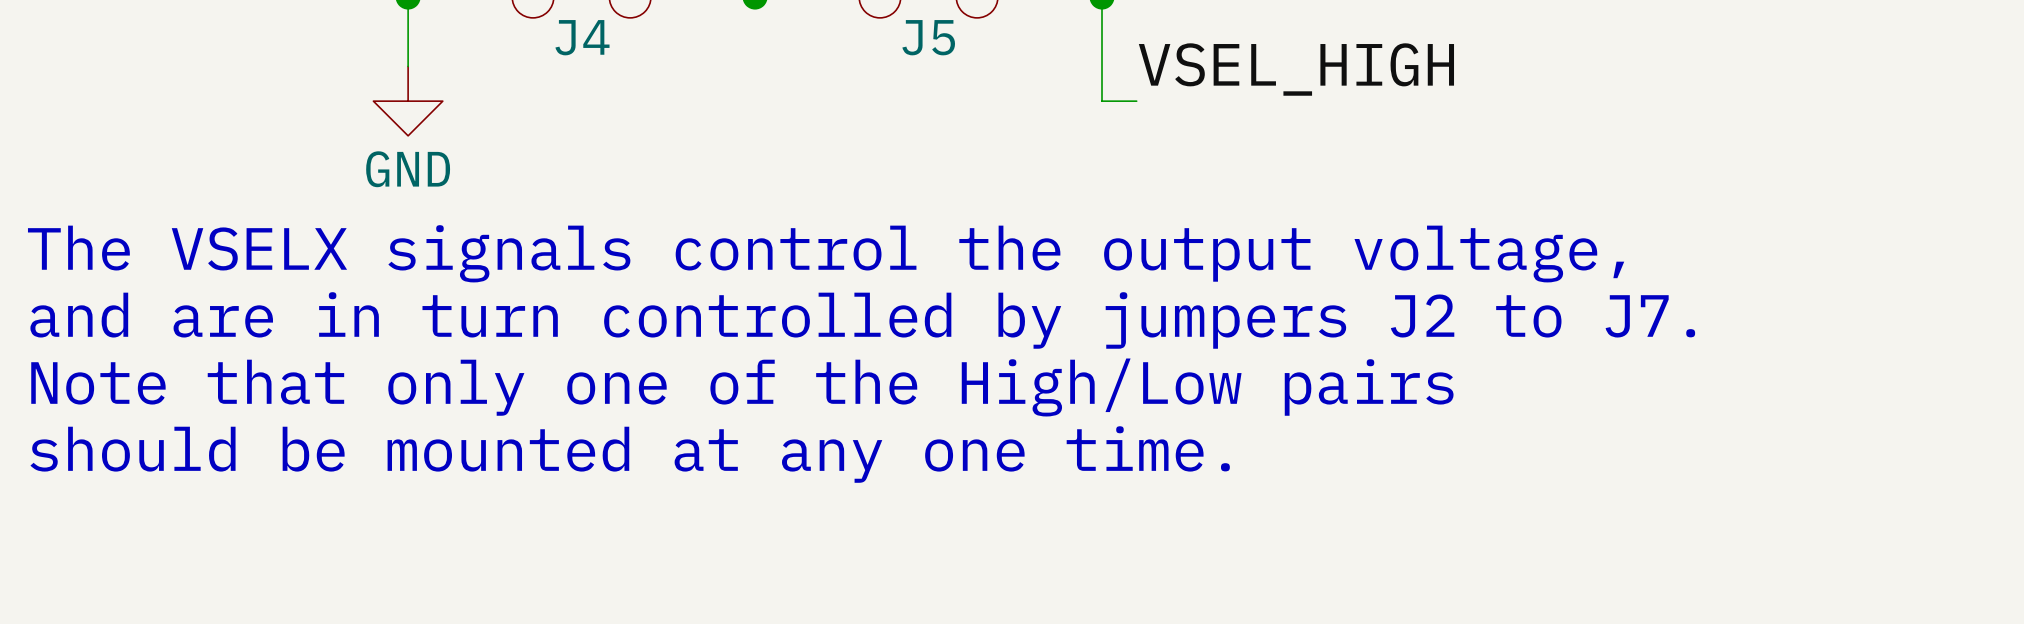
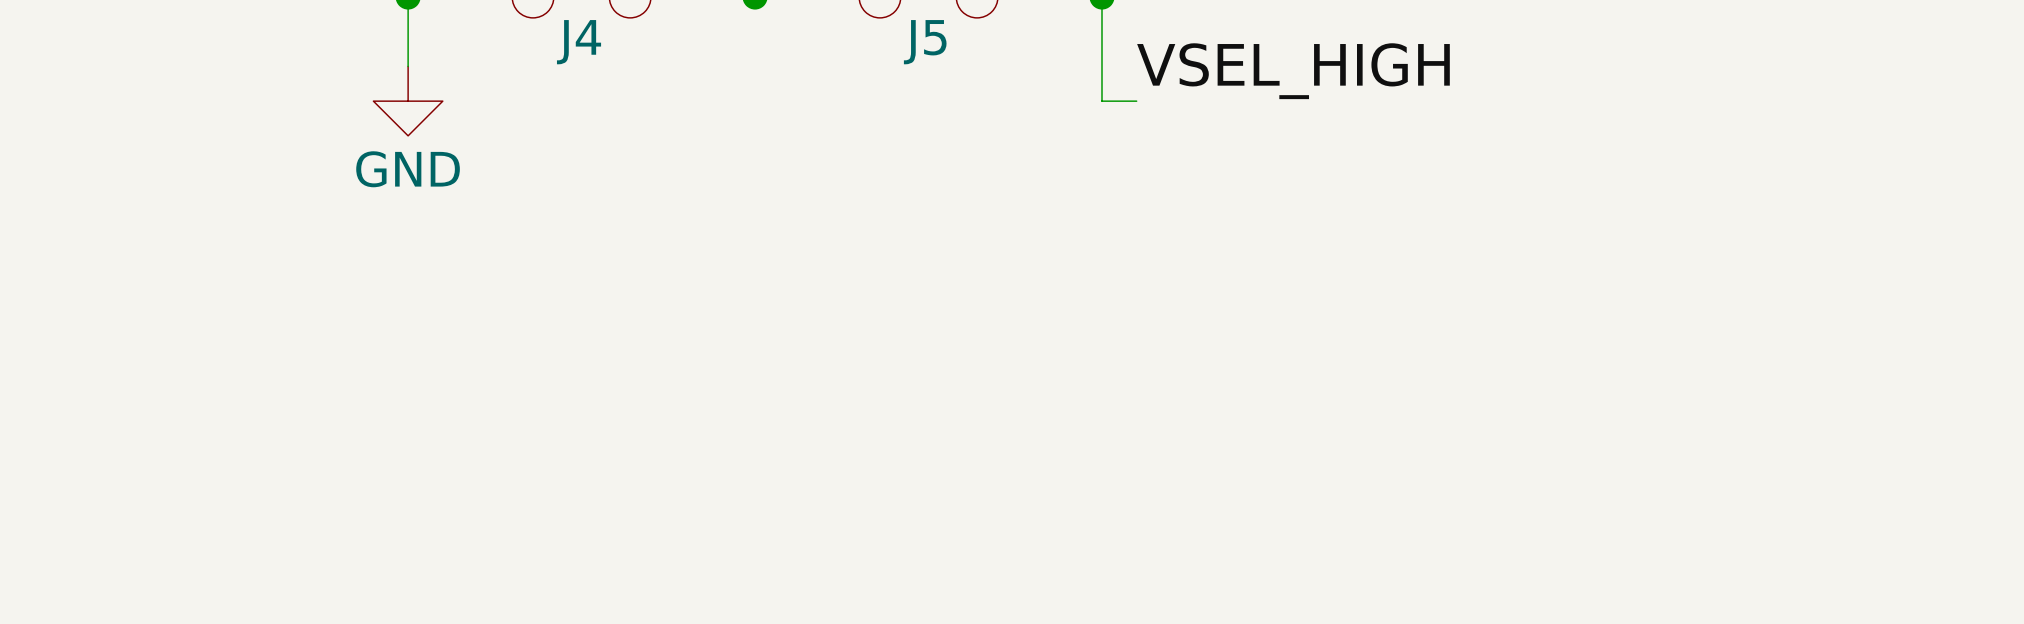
text: The VSELX signals control the output voltage, (826, 253) -> none
text: and are in turn controlled by jumpers J2 to J7. (862, 320) -> none
text: Note that only one of the High/Low pairs (742, 387) -> none
text: should be mounted at any one time. (630, 454) -> none

